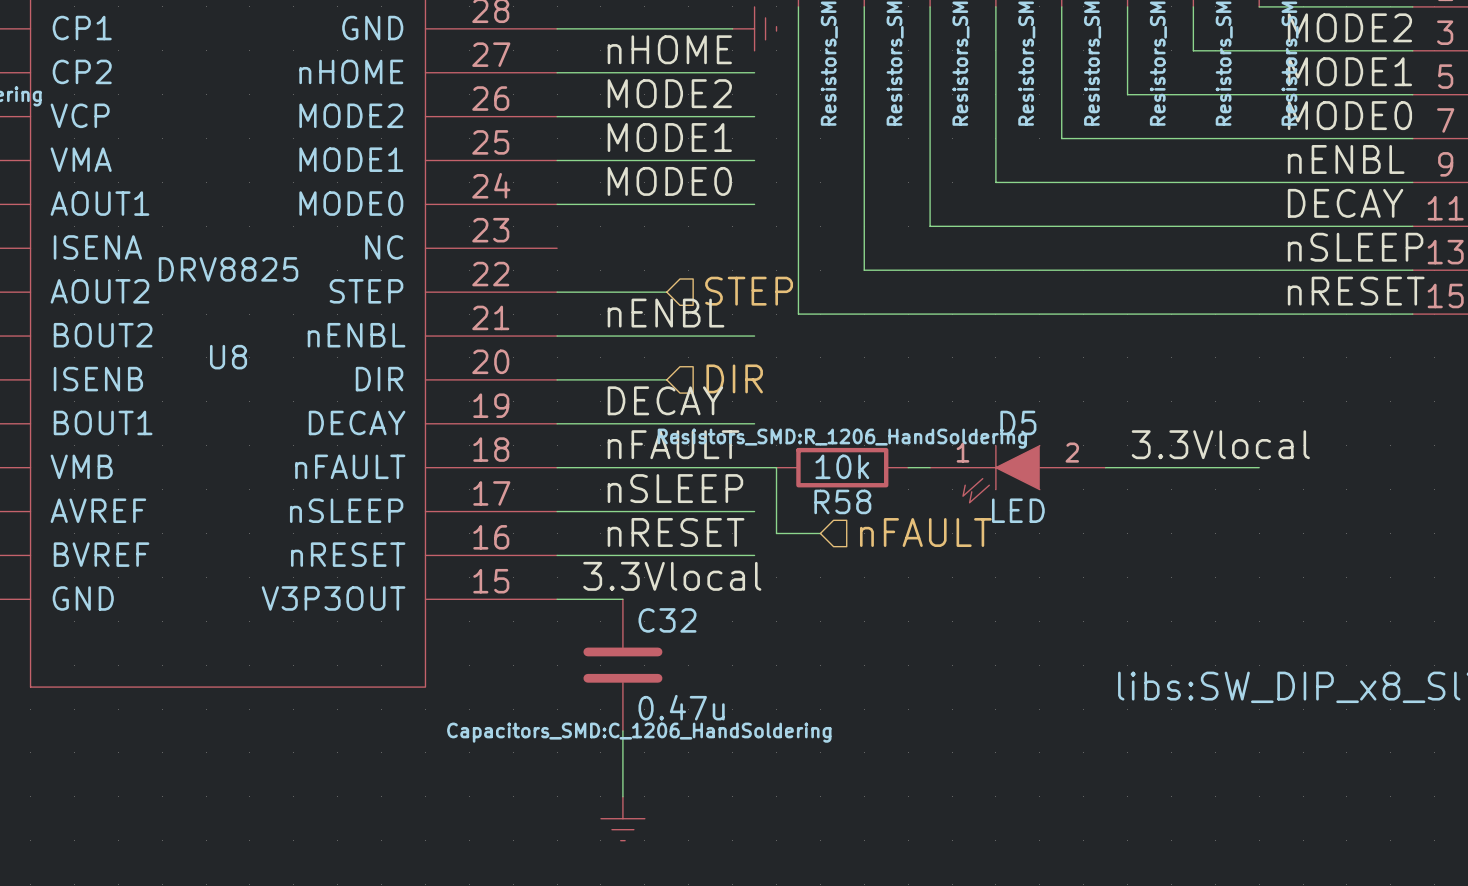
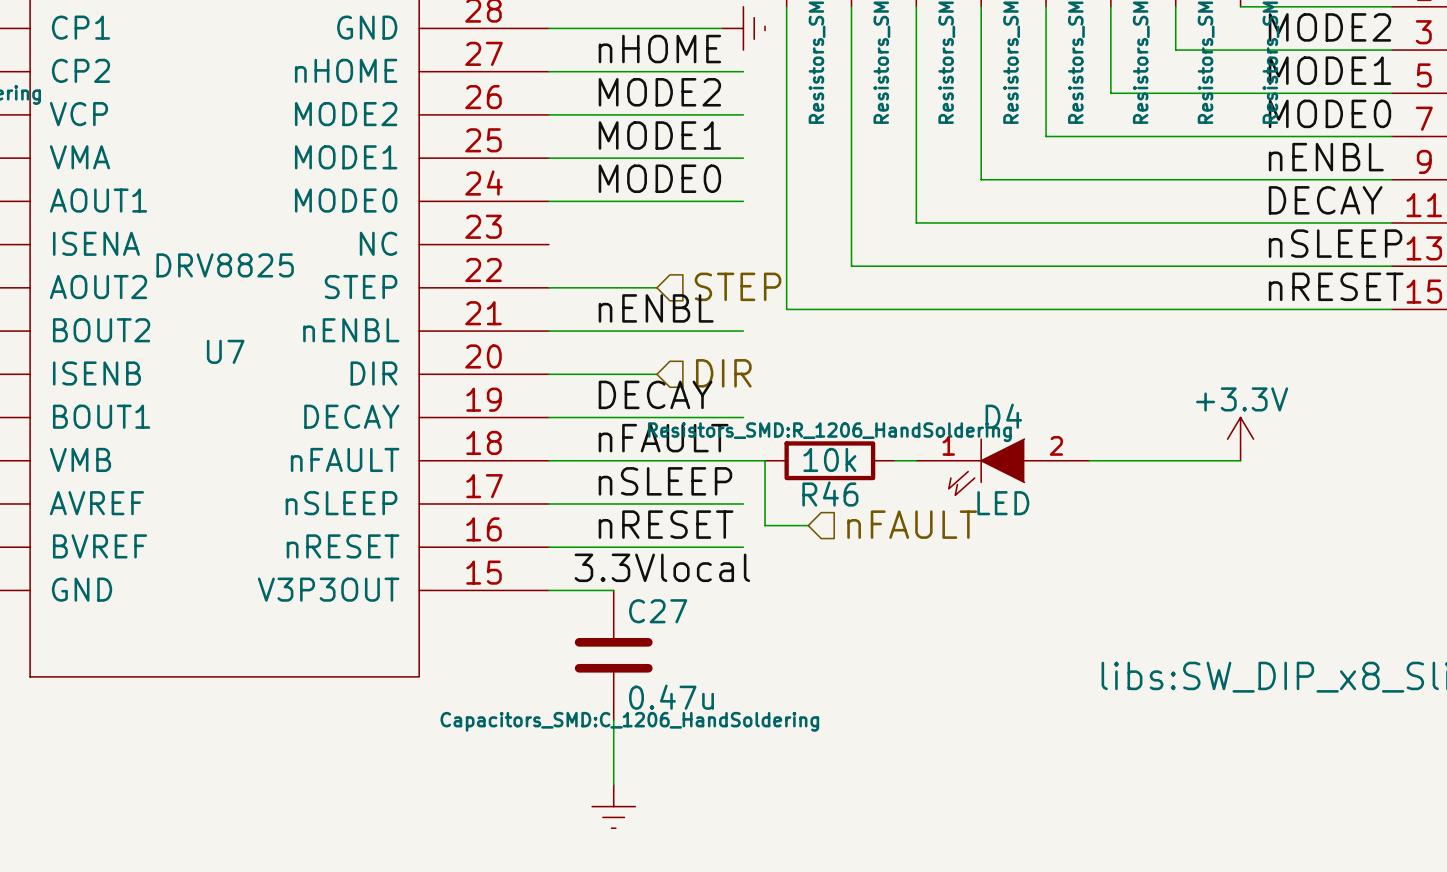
U8 name: U8 (228, 357) -> U7 (225, 351)
D5 name: D5 (1018, 422) -> D4 (1003, 416)
label: 3.3Vlocal (1220, 444) -> none
power symbol: none -> +3.3V (1240, 439)
R58 name: R58 (842, 501) -> R46 (830, 494)
C32 name: C32 (667, 620) -> C27 (658, 611)

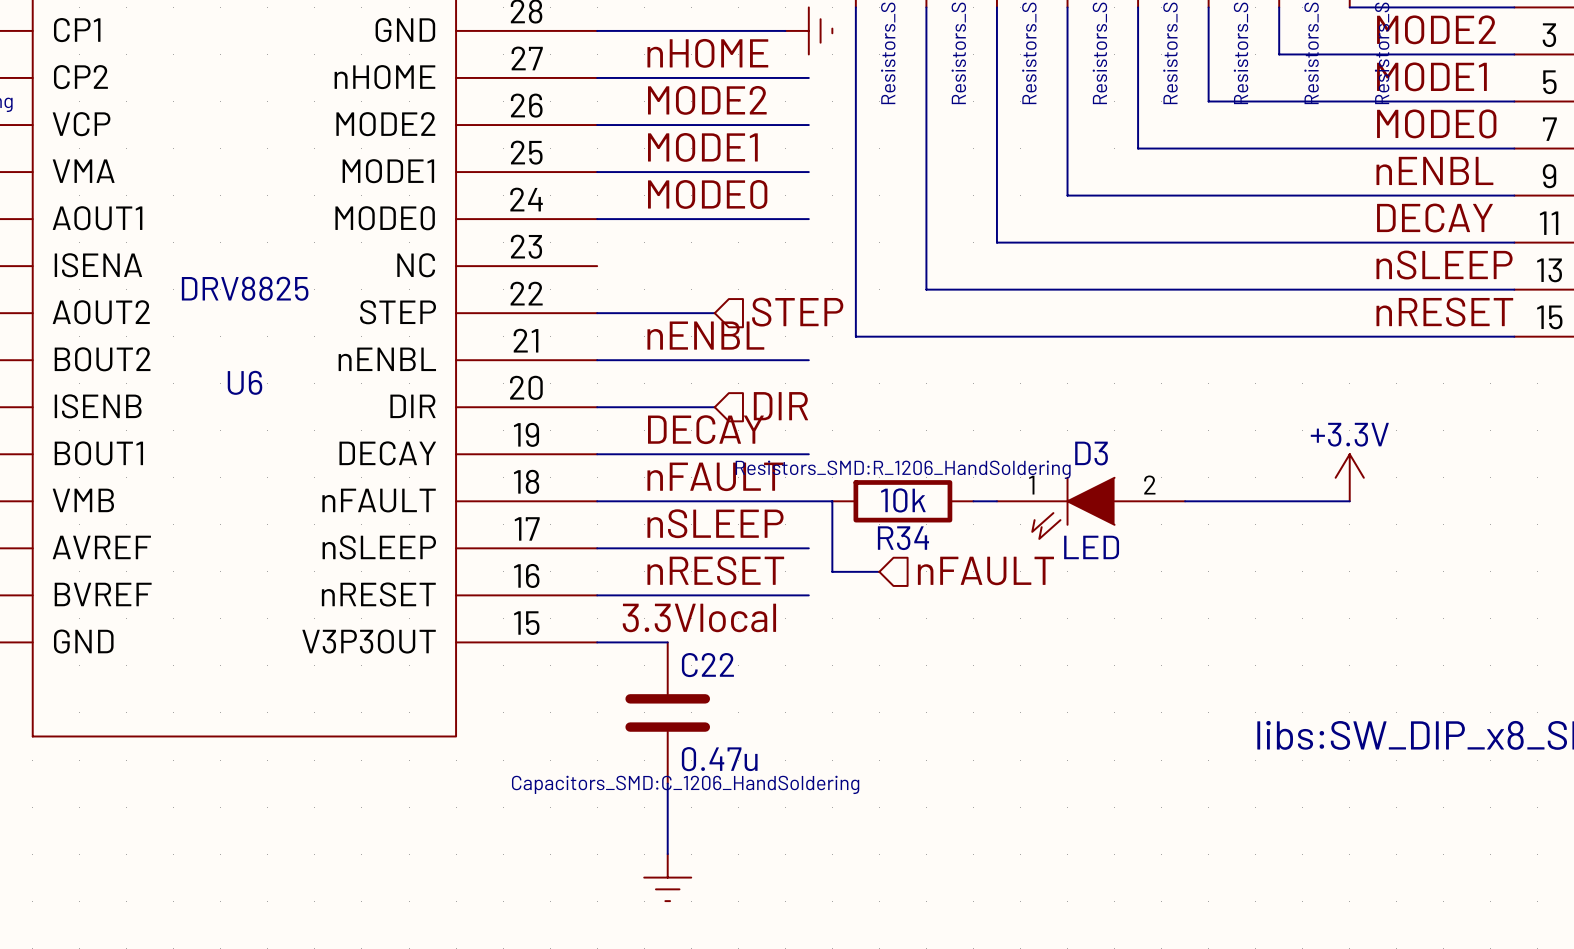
U7 name: U7 (225, 351) -> U6 (245, 382)
D4 name: D4 (1003, 416) -> D3 (1091, 453)
R46 name: R46 (830, 494) -> R34 (903, 538)
C27 name: C27 (658, 611) -> C22 (707, 665)

